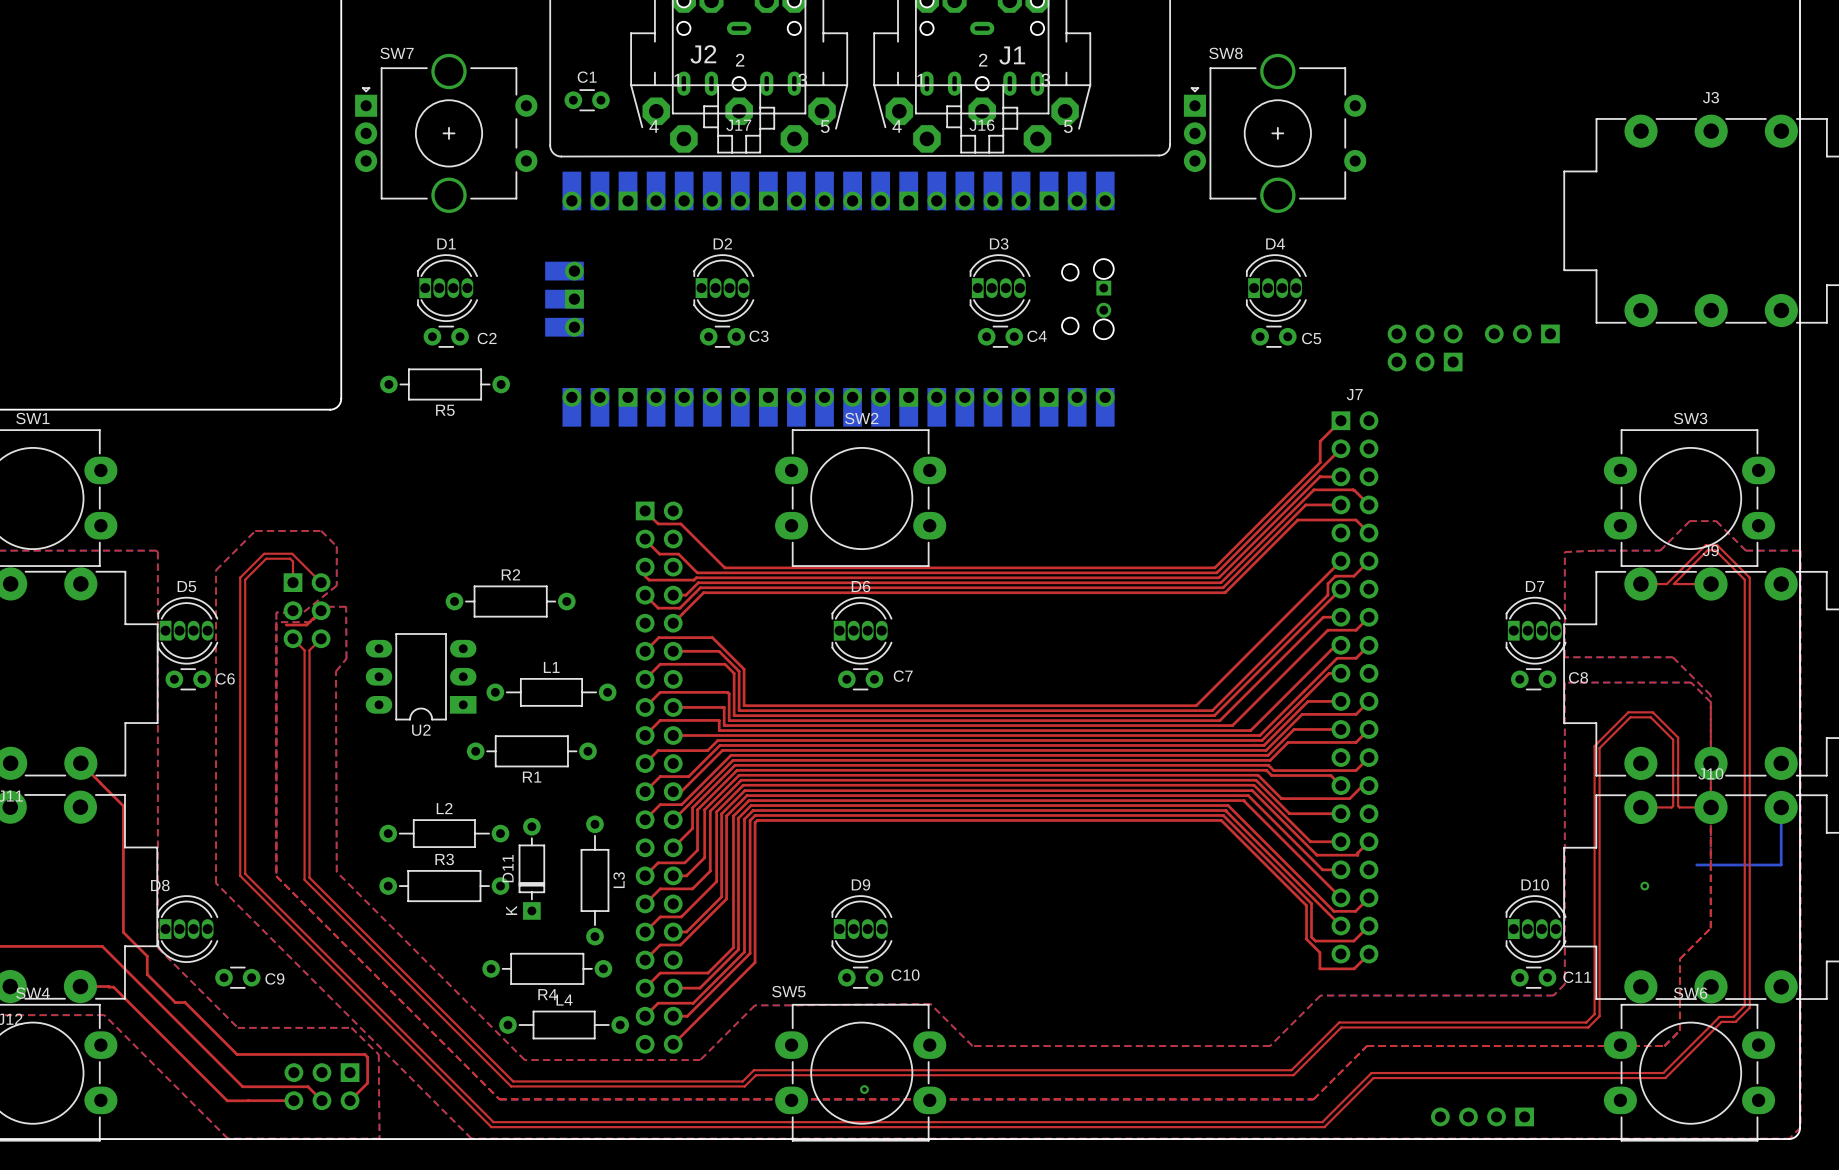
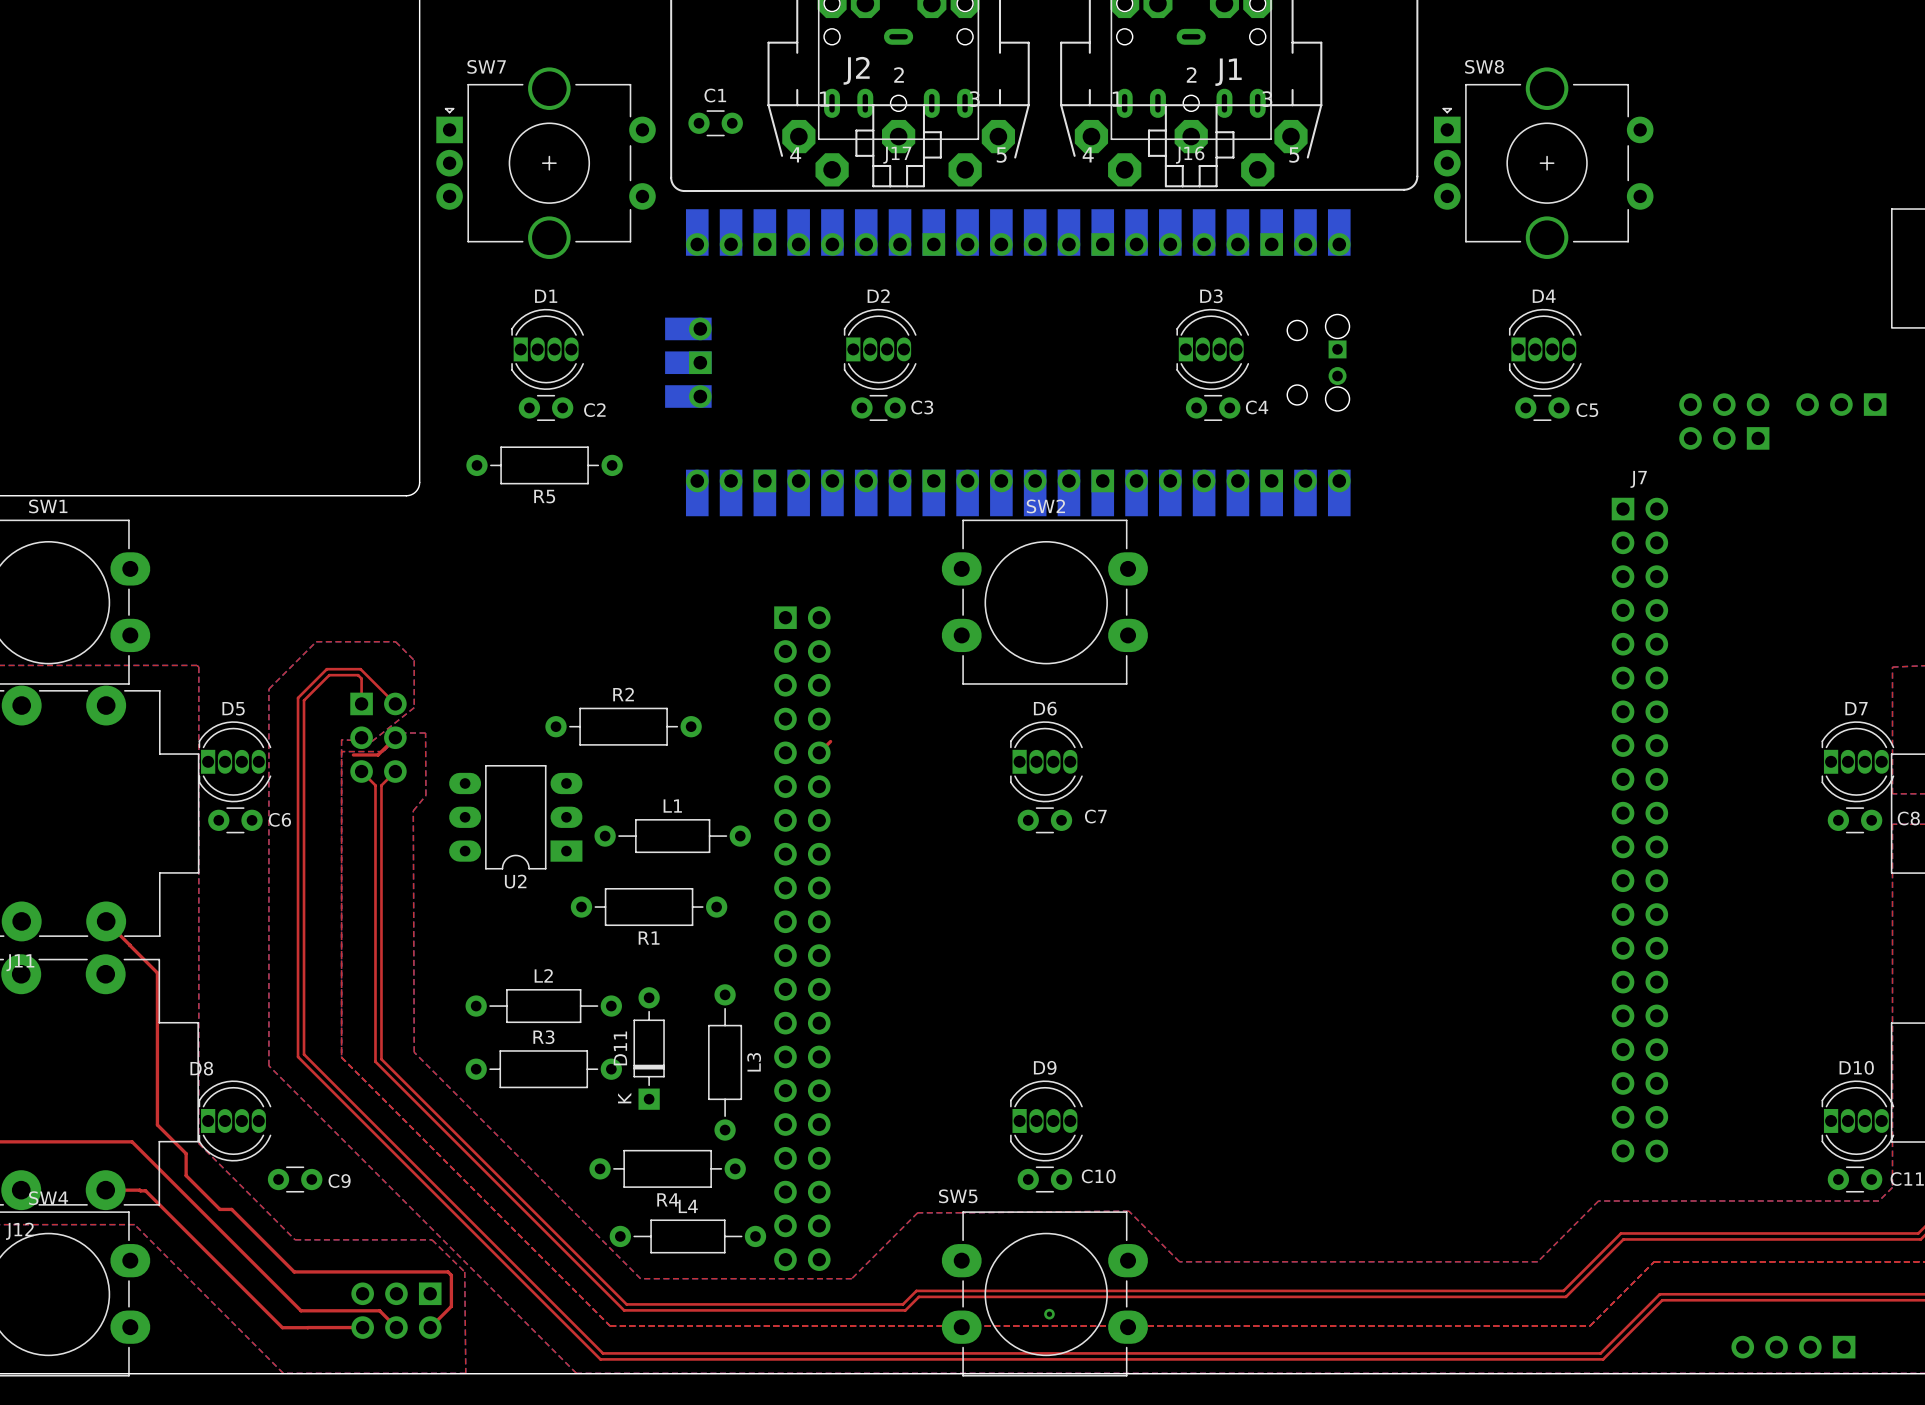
top track: (1340, 420) (1320, 441) (1320, 462) (1214, 567) (724, 567) (680, 523) (658, 523) (645, 510) -> none
top track: (1340, 448) (1216, 572) (697, 572) (678, 554) (659, 554) (645, 539) -> none
top track: (1340, 476) (1320, 476) (1218, 577) (696, 577) (693, 580) (649, 580) (645, 576) (645, 567) -> none
top track: (1340, 504) (1305, 504) (1223, 587) (700, 587) (679, 608) (658, 608) (645, 595) -> none
top track: (1369, 504) (1353, 489) (1313, 489) (1221, 582) (698, 582) (685, 595) (673, 595) -> none
top track: (1369, 533) (1356, 520) (1297, 520) (1225, 592) (703, 592) (682, 613) -> none
top track: (1340, 561) (1196, 705) (744, 705) (744, 669) (712, 637) (658, 637) (645, 651) -> none
top track: (1369, 561) (1353, 576) (1335, 576) (1327, 583) (1327, 595) (1212, 710) (739, 710) (739, 671) (719, 651) (673, 651) -> none
top track: (1340, 589) (1214, 715) (734, 715) (734, 673) (725, 664) (660, 664) (645, 679) -> none
top track: (1340, 617) (1323, 617) (1219, 720) (729, 720) (727, 692) (660, 692) (645, 707) -> none
top track: (1369, 617) (1356, 630) (1327, 630) (1232, 725) (724, 725) (724, 707) (673, 707) -> none
top track: (1340, 645) (1335, 645) (1250, 730) (719, 730) (719, 720) (660, 720) (645, 735) -> none
top track: (1369, 645) (1356, 658) (1337, 658) (1259, 735) (673, 735) -> none
top track: (1340, 673) (1329, 673) (1261, 740) (717, 740) (707, 750) (658, 750) (645, 763) -> none
top track: (1340, 701) (1308, 701) (1264, 745) (719, 745) (688, 776) (660, 776) (645, 791) -> none
top track: (1369, 701) (1356, 714) (1302, 714) (1266, 750) (722, 750) (681, 791) (673, 791) -> none
top track: (1340, 729) (1294, 729) (1268, 755) (730, 755) (681, 804) (660, 804) (645, 819) -> none
top track: (1369, 729) (1356, 742) (1288, 742) (1270, 760) (732, 760) (673, 819) -> none
top track: (1369, 757) (1356, 770) (1273, 770) (1268, 765) (735, 765) (692, 807) (692, 828) (673, 847) -> none
top track: (1340, 785) (1330, 775) (1271, 775) (1266, 770) (737, 770) (697, 809) (697, 850) (684, 862) (658, 862) (645, 875) -> none
top track: (1369, 785) (1362, 785) (1349, 798) (1281, 798) (1258, 775) (739, 775) (704, 809) (704, 857) (686, 875) (673, 875) -> none
top track: (1340, 813) (1289, 813) (1256, 780) (741, 780) (710, 811) (710, 871) (692, 888) (660, 888) (645, 903) -> none
top track: (1340, 841) (1310, 841) (1254, 785) (743, 785) (716, 811) (716, 881) (681, 916) (660, 916) (645, 932) -> none
top track: (1369, 841) (1357, 855) (1316, 855) (1252, 790) (744, 790) (721, 813) (721, 896) (686, 932) (673, 932) -> none
top track: (1340, 869) (1322, 869) (1248, 795) (746, 795) (726, 816) (726, 898) (680, 944) (660, 944) (645, 960) -> none
top track: (1340, 897) (1244, 800) (749, 800) (733, 816) (733, 947) (708, 973) (660, 973) (645, 988) -> none
top track: (1369, 897) (1355, 911) (1333, 911) (1228, 805) (751, 805) (738, 818) (738, 949) (699, 988) (673, 988) -> none
top track: (1340, 925) (1226, 810) (753, 810) (744, 819) (744, 952) (693, 1003) (658, 1003) (645, 1016) -> none
top track: (1369, 925) (1353, 941) (1315, 941) (1311, 937) (1311, 903) (1223, 815) (755, 815) (750, 820) (750, 953) (687, 1016) (673, 1016) -> none
top track: (1369, 954) (1354, 968) (1319, 968) (1319, 952) (1306, 939) (1306, 905) (1221, 820) (757, 820) (755, 822) (755, 962) (673, 1044) -> none

